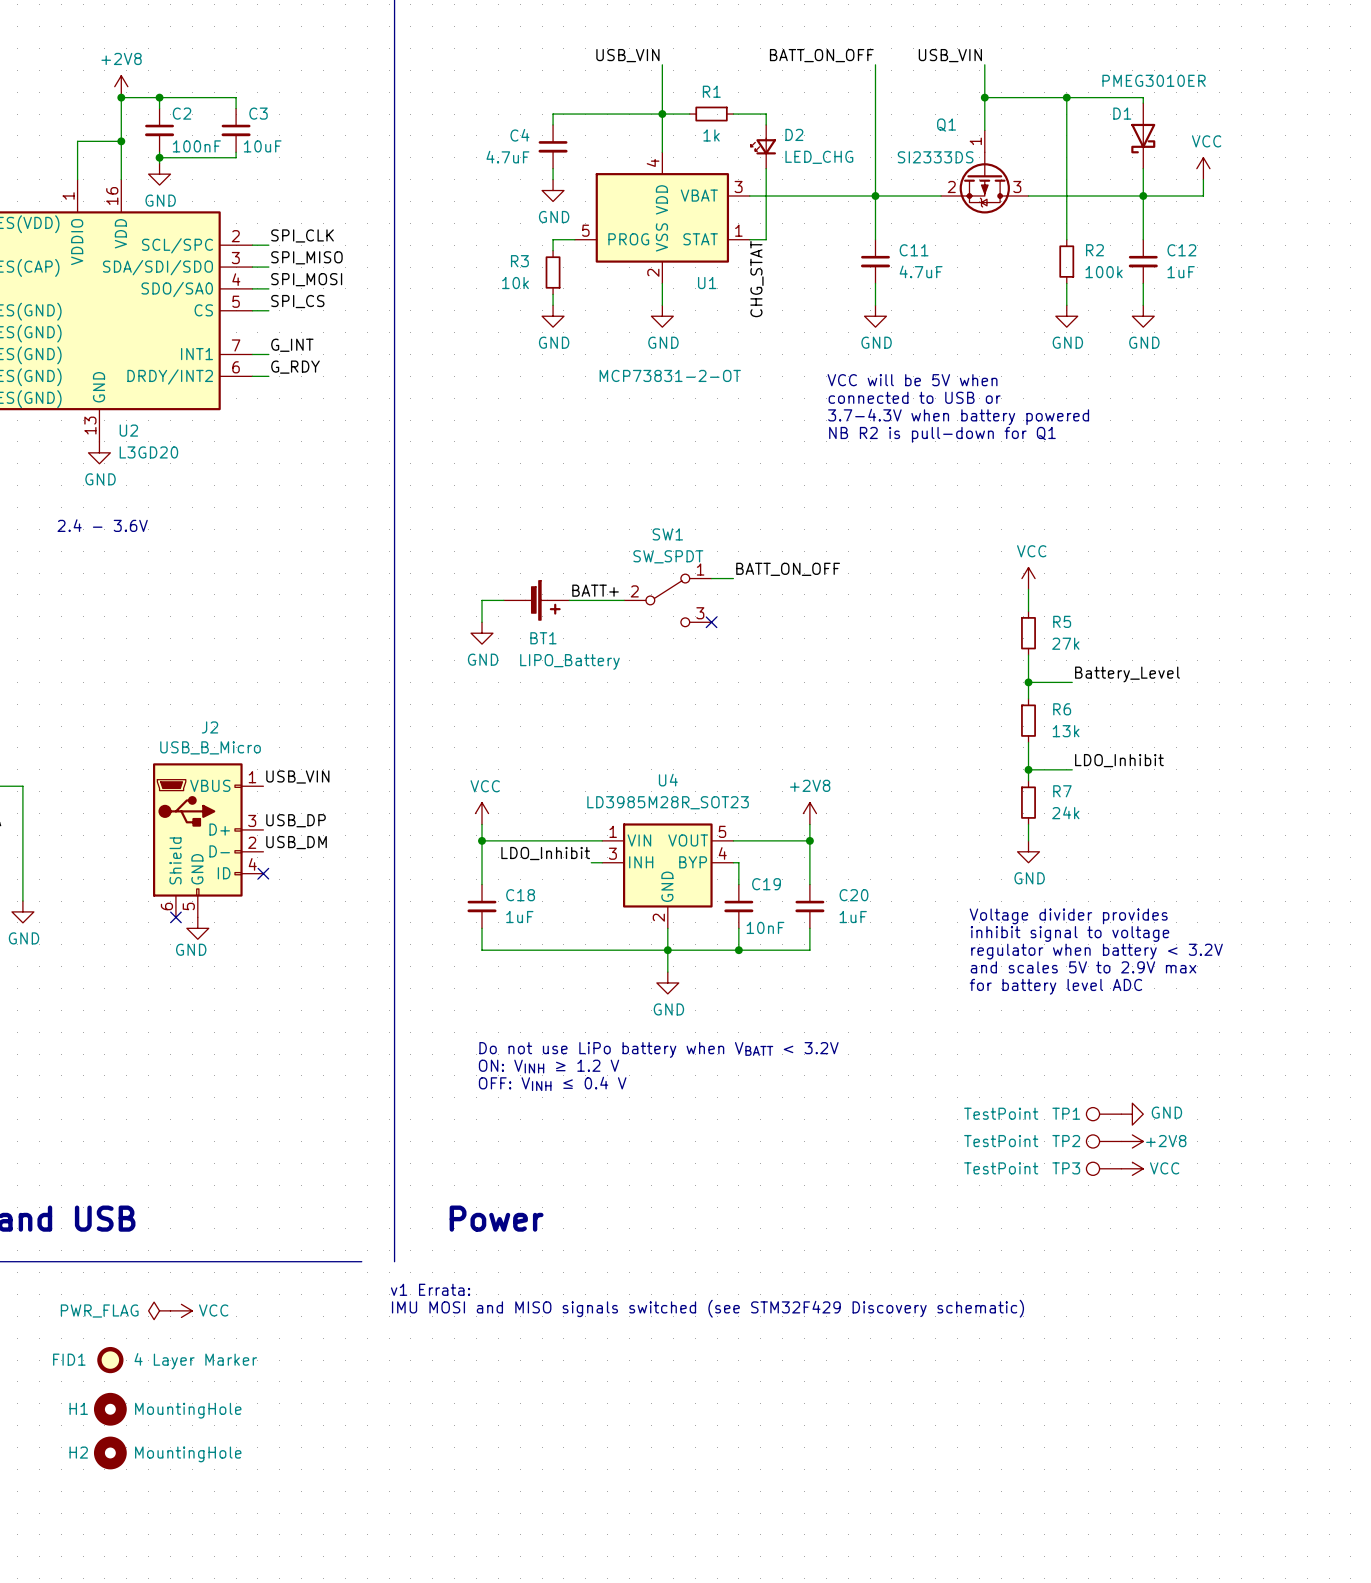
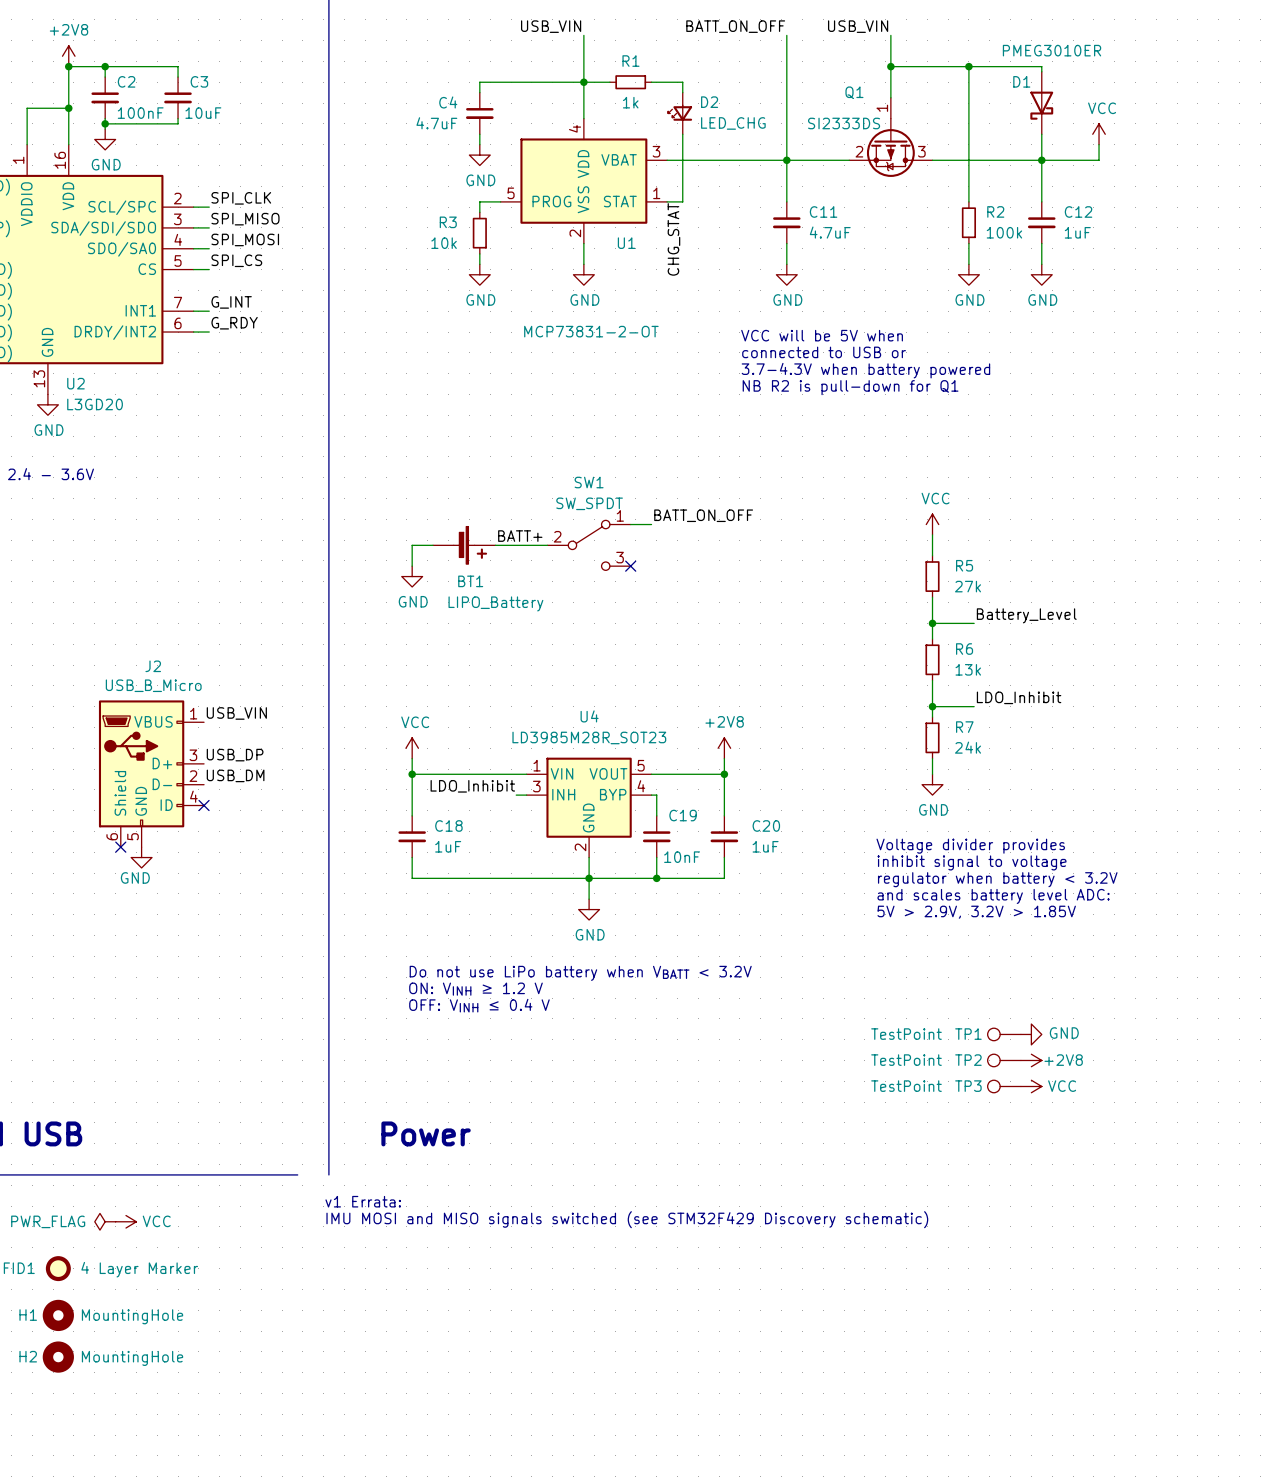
text: and scales 5V to 2.9V max (1083, 967) -> and scales battery level ADC: (993, 896)
text: for battery level ADC (1055, 986) -> 5V > 2.9V, 3.2V > 1.85V (976, 912)

